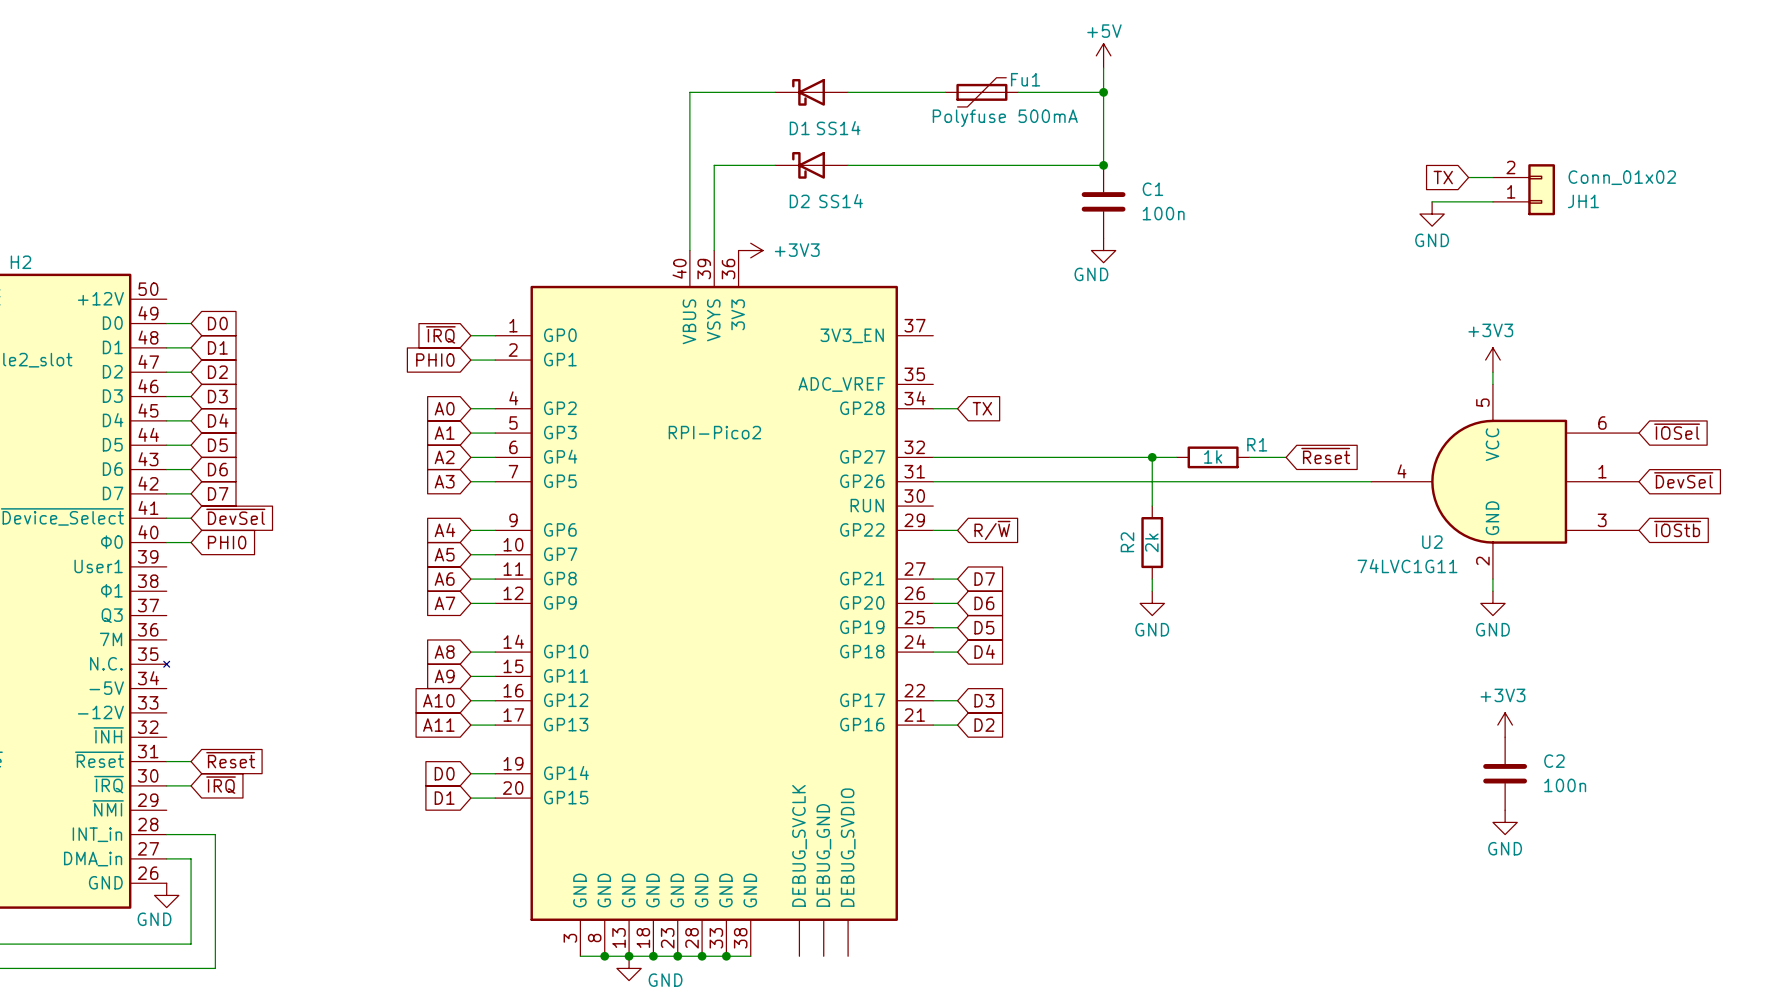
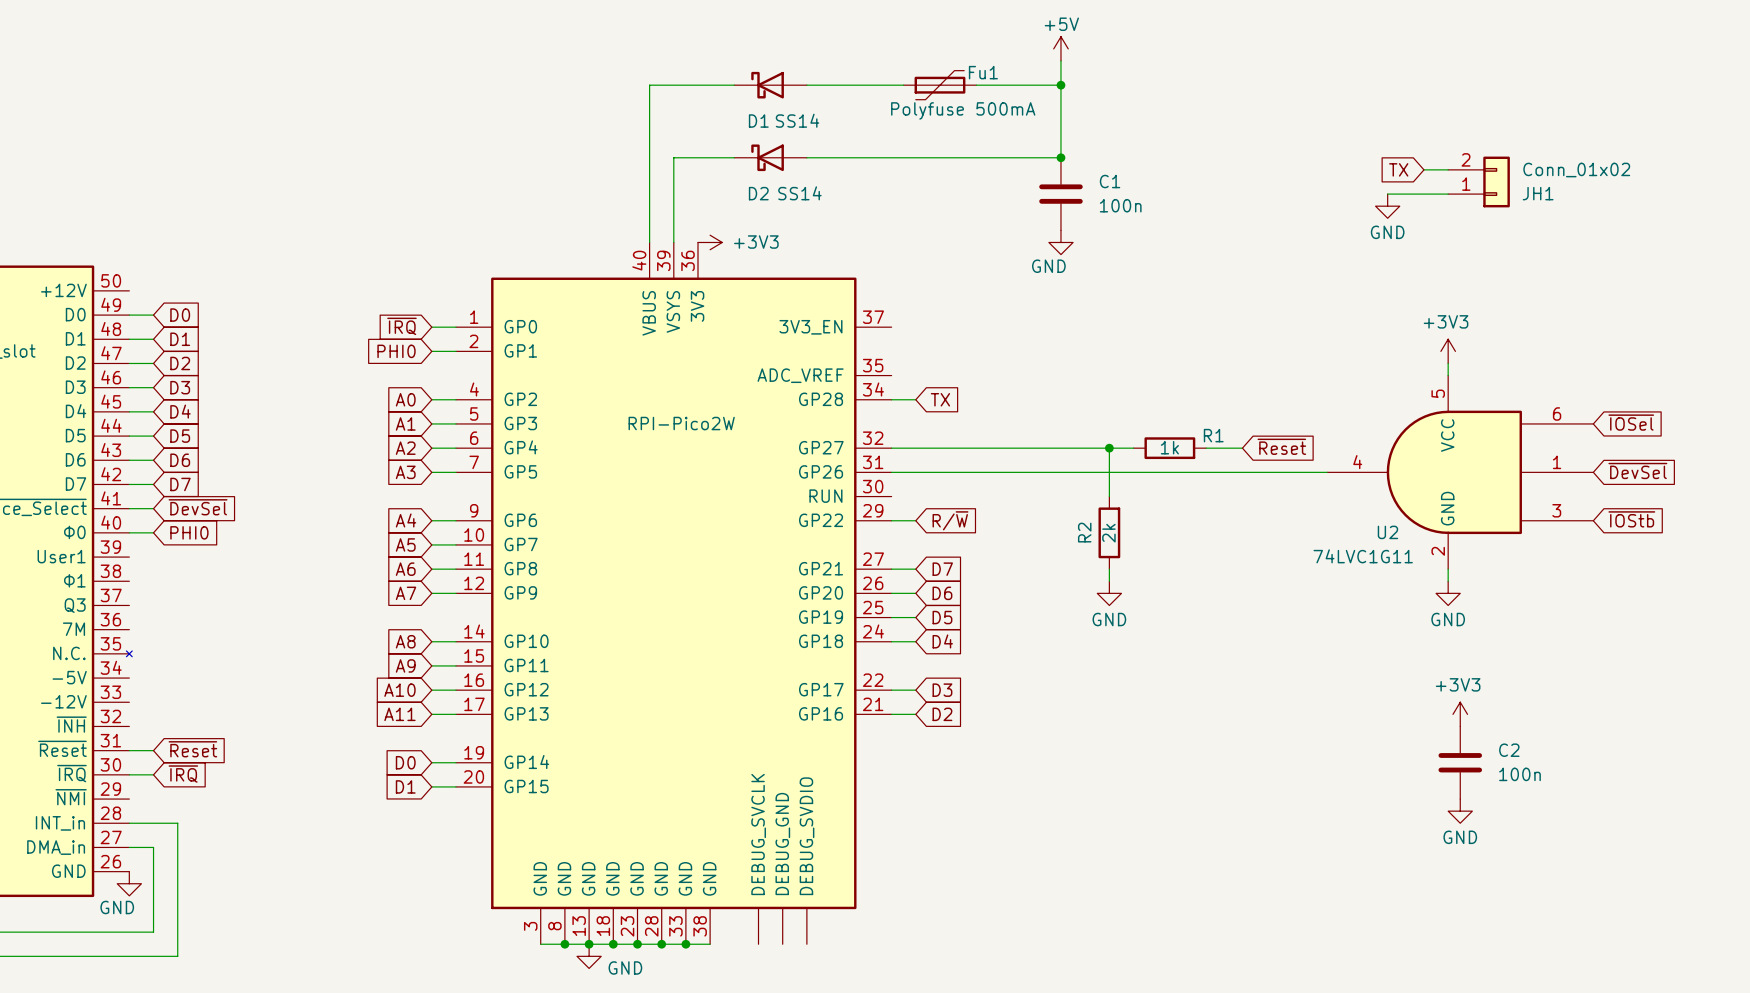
part value: RPI-Pico2 (714, 432) -> RPI-Pico2W (681, 423)

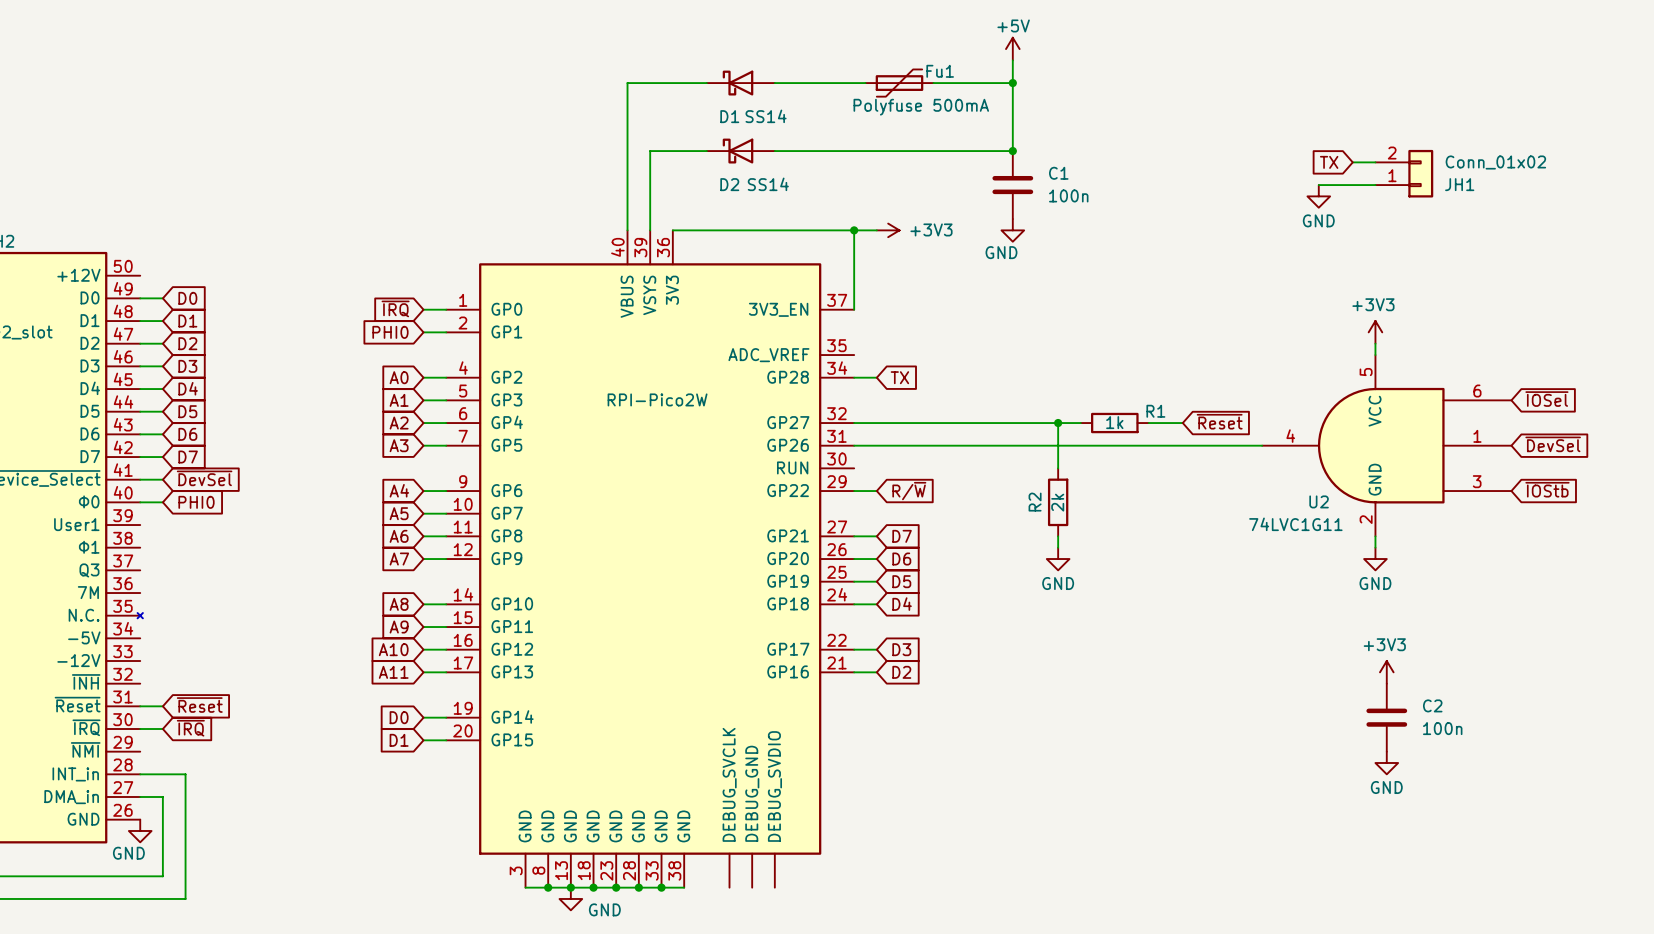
wire: none -> (672, 230) (876, 230)
power symbol position: +3V3 (710, 242) -> +3V3 (888, 230)
wire: none -> (854, 230) (854, 309)
junction: none -> (854, 230)

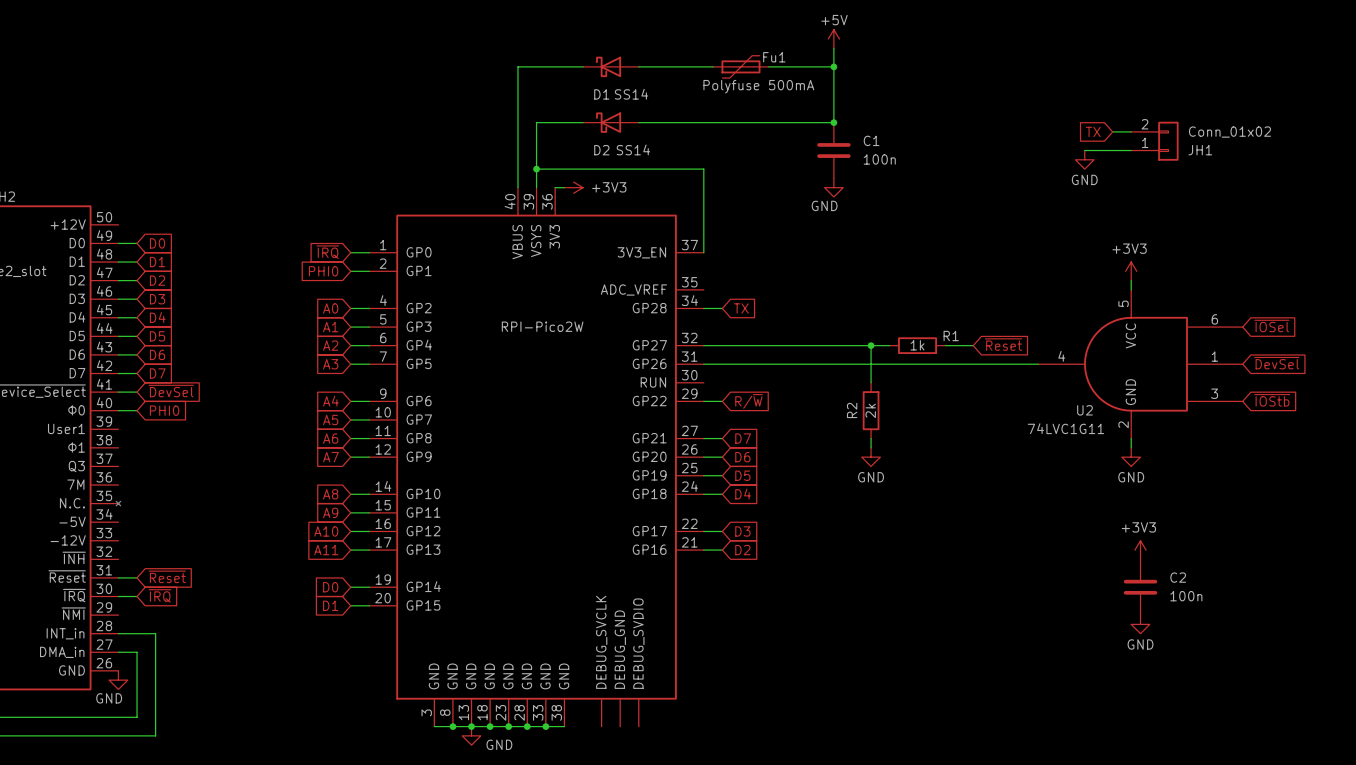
wire: none -> (536, 169) (703, 169) (703, 187)
junction: none -> (536, 169)
wire: (684, 230) (876, 230) -> none
junction: (854, 230) -> none
power symbol position: +3V3 (888, 230) -> +3V3 (573, 187)

